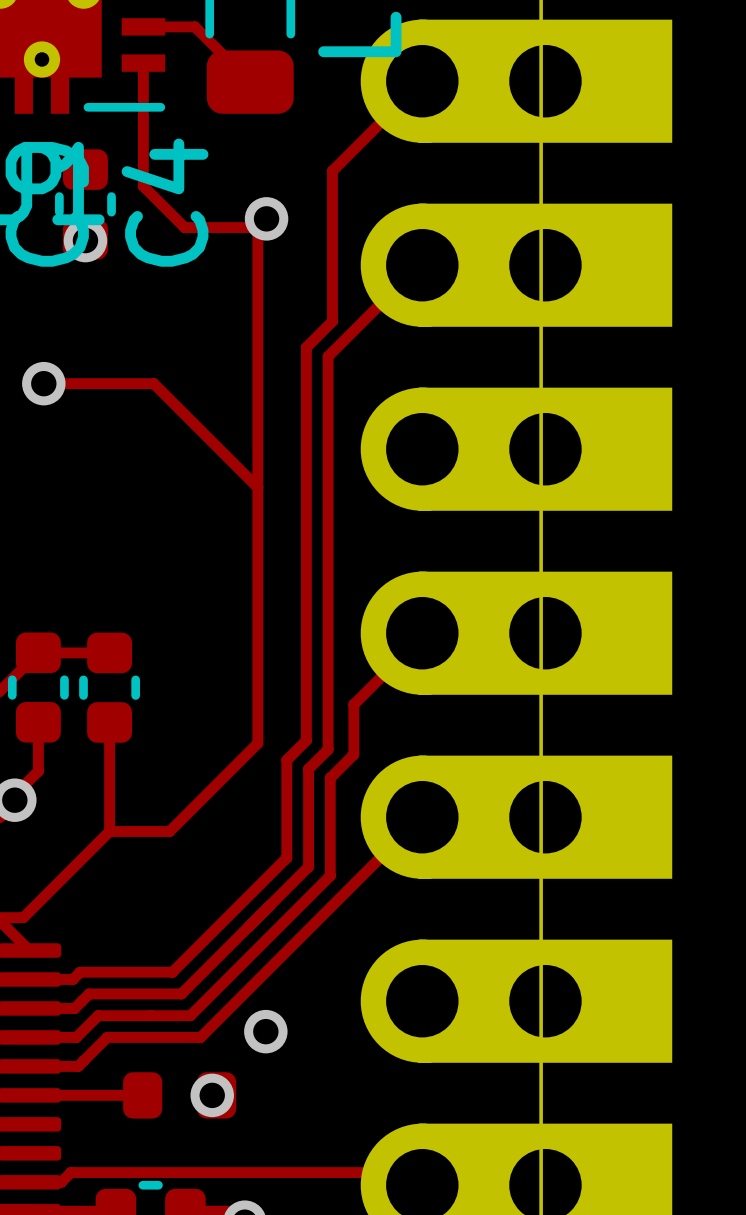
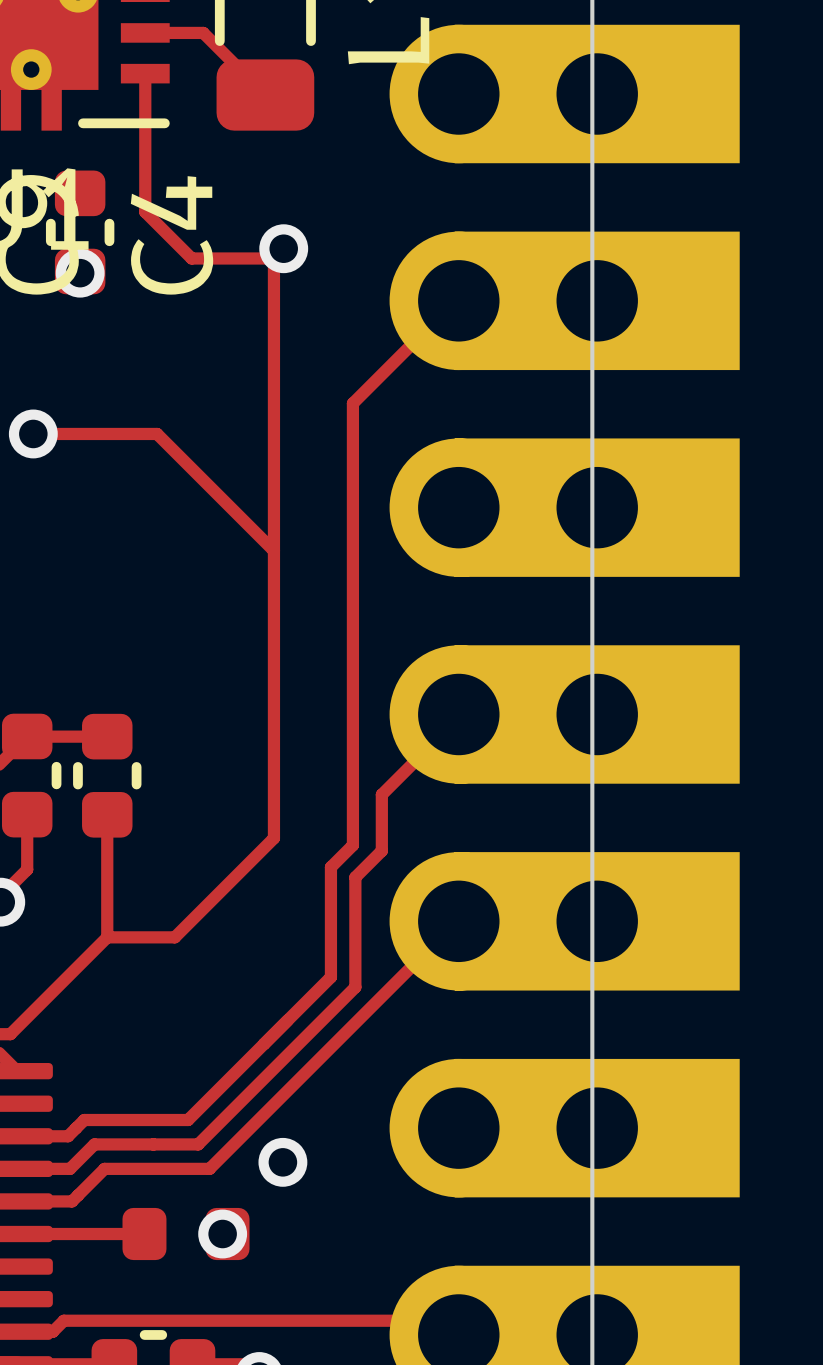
track: (422, 81) (332, 171) (332, 321) (306, 347) (306, 740) (286, 760) (286, 857) (172, 972) (80, 972) (72, 979) (29, 979) -> none

